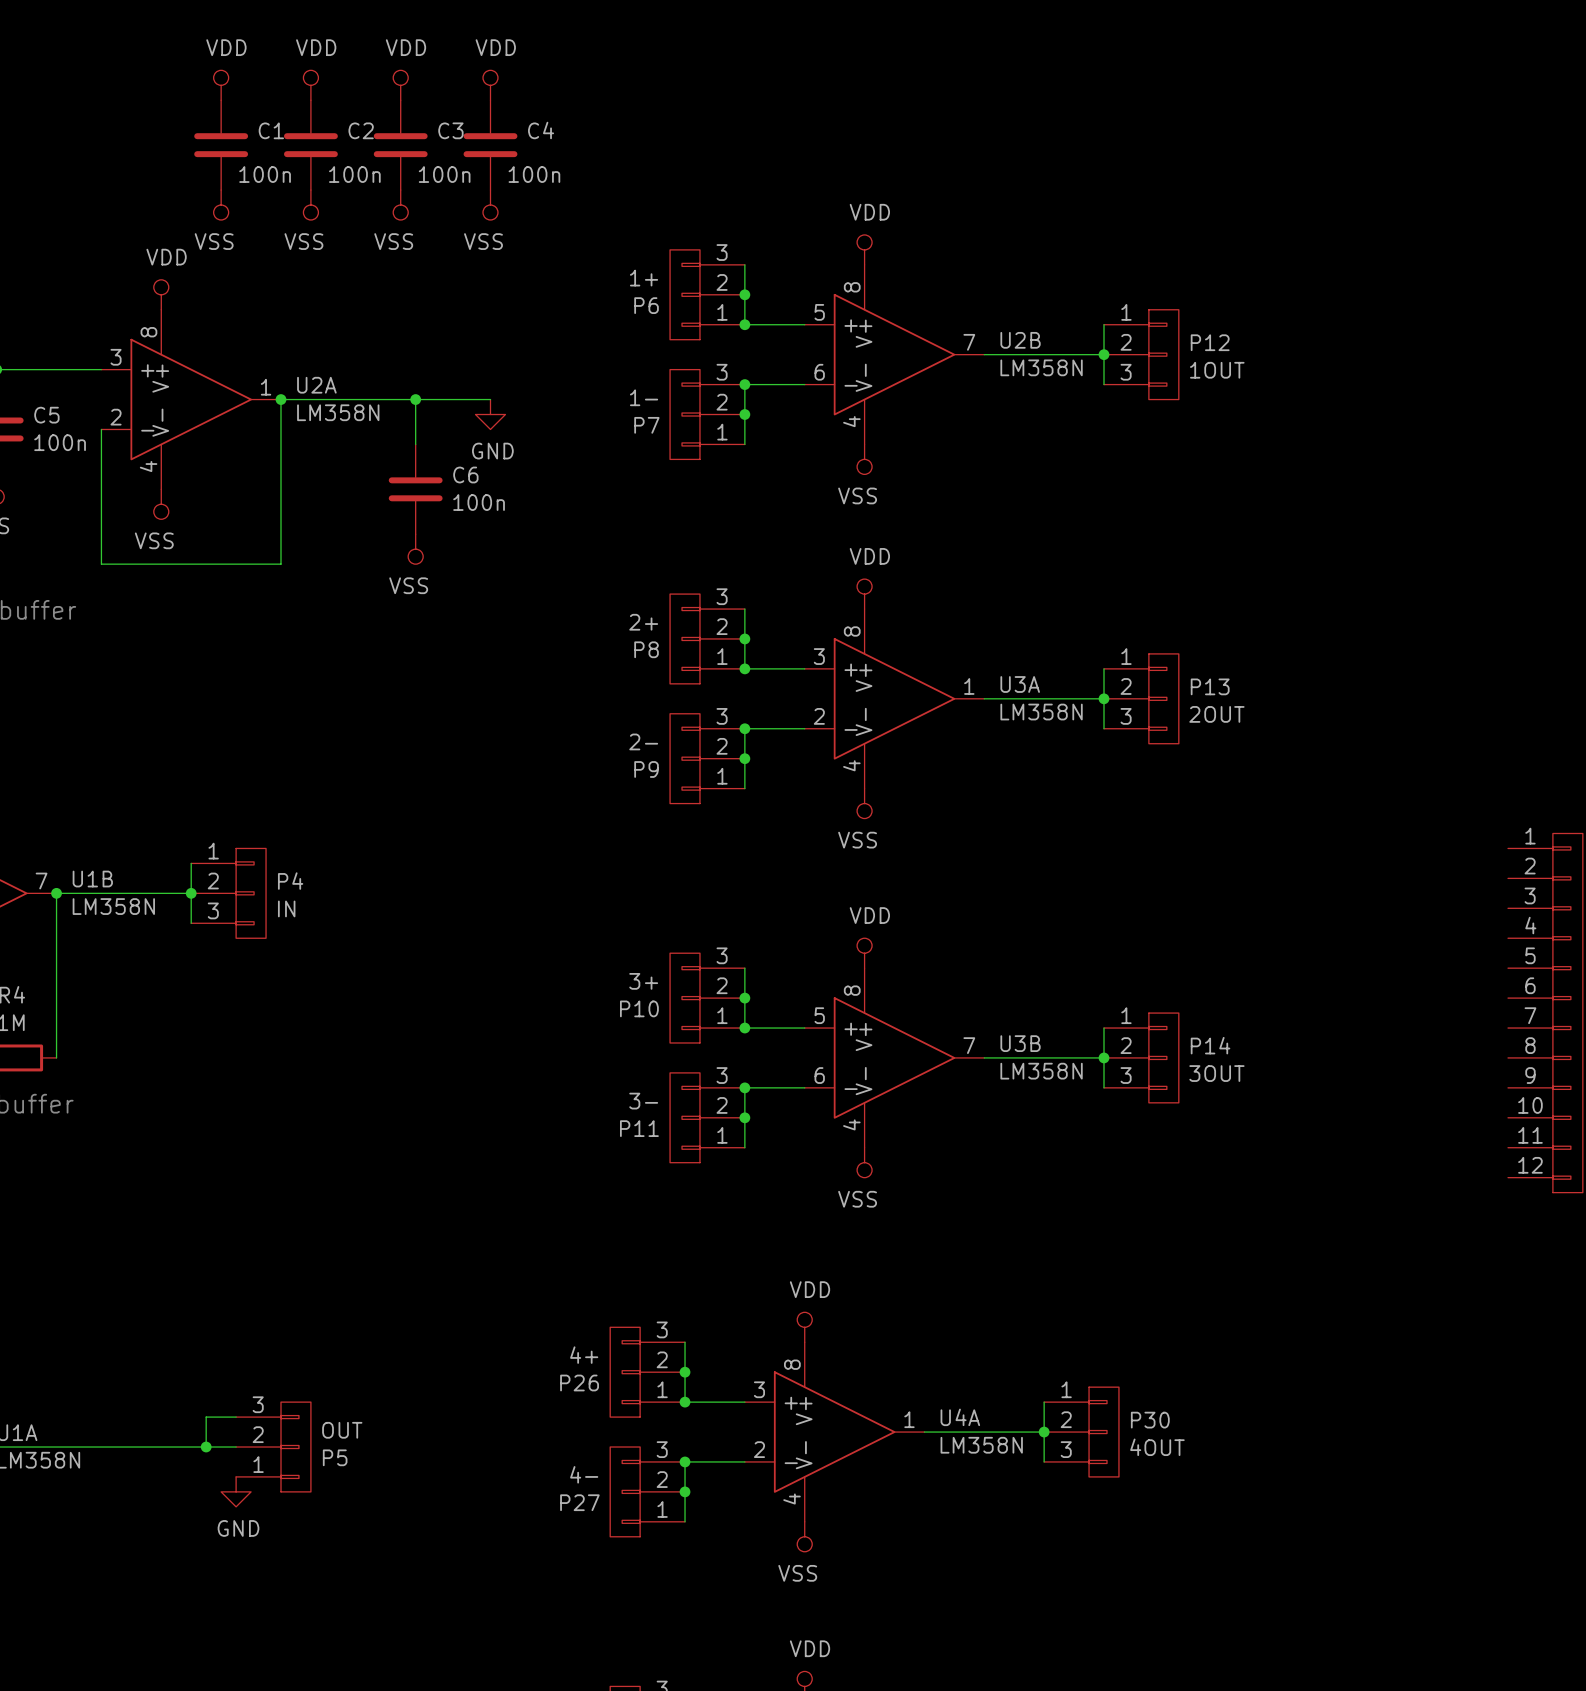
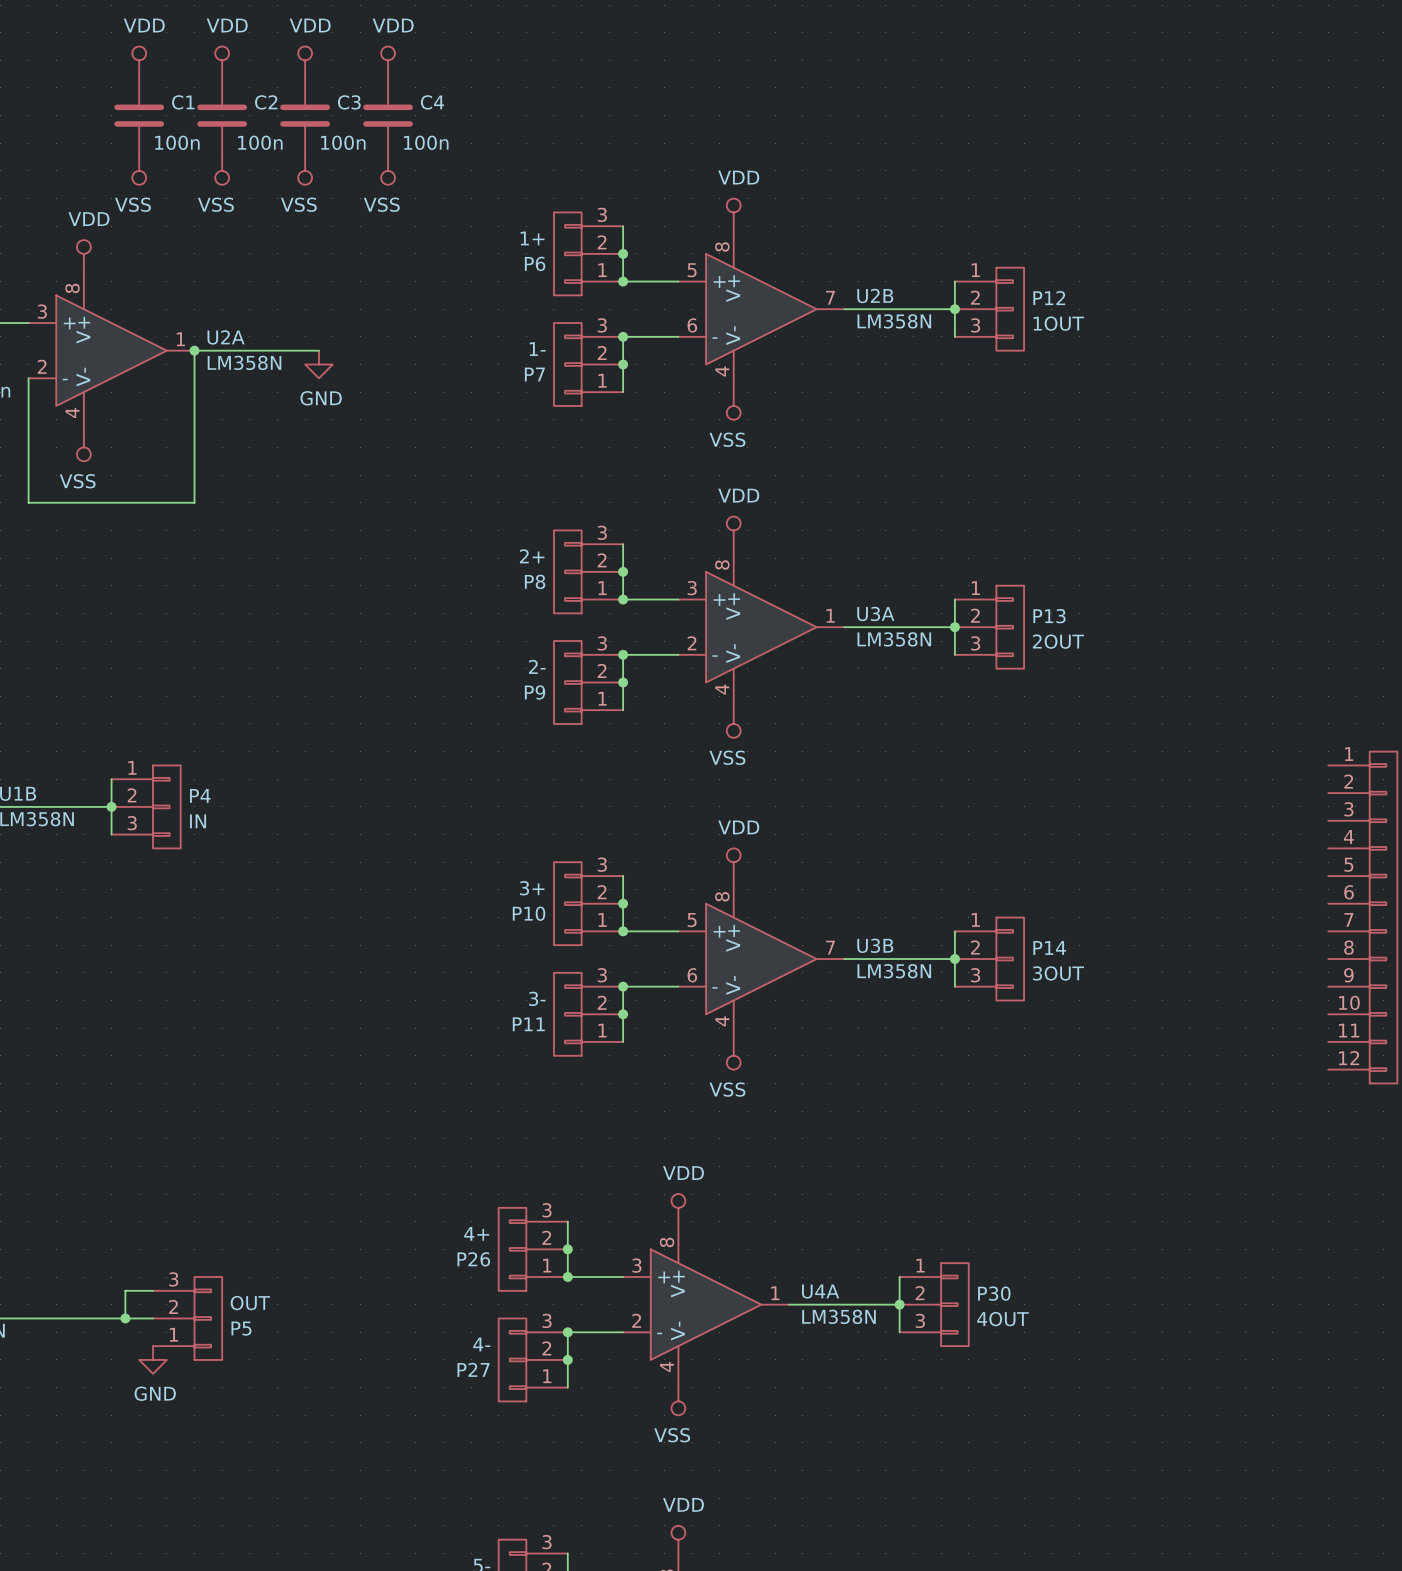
junction: (415, 399) -> none
wire: (490, 399) (415, 399) (415, 444) -> none
power symbol position: GND (490, 414) -> GND (318, 364)
C6: 100n (415, 489) -> none
power symbol: VSS (415, 549) -> none

